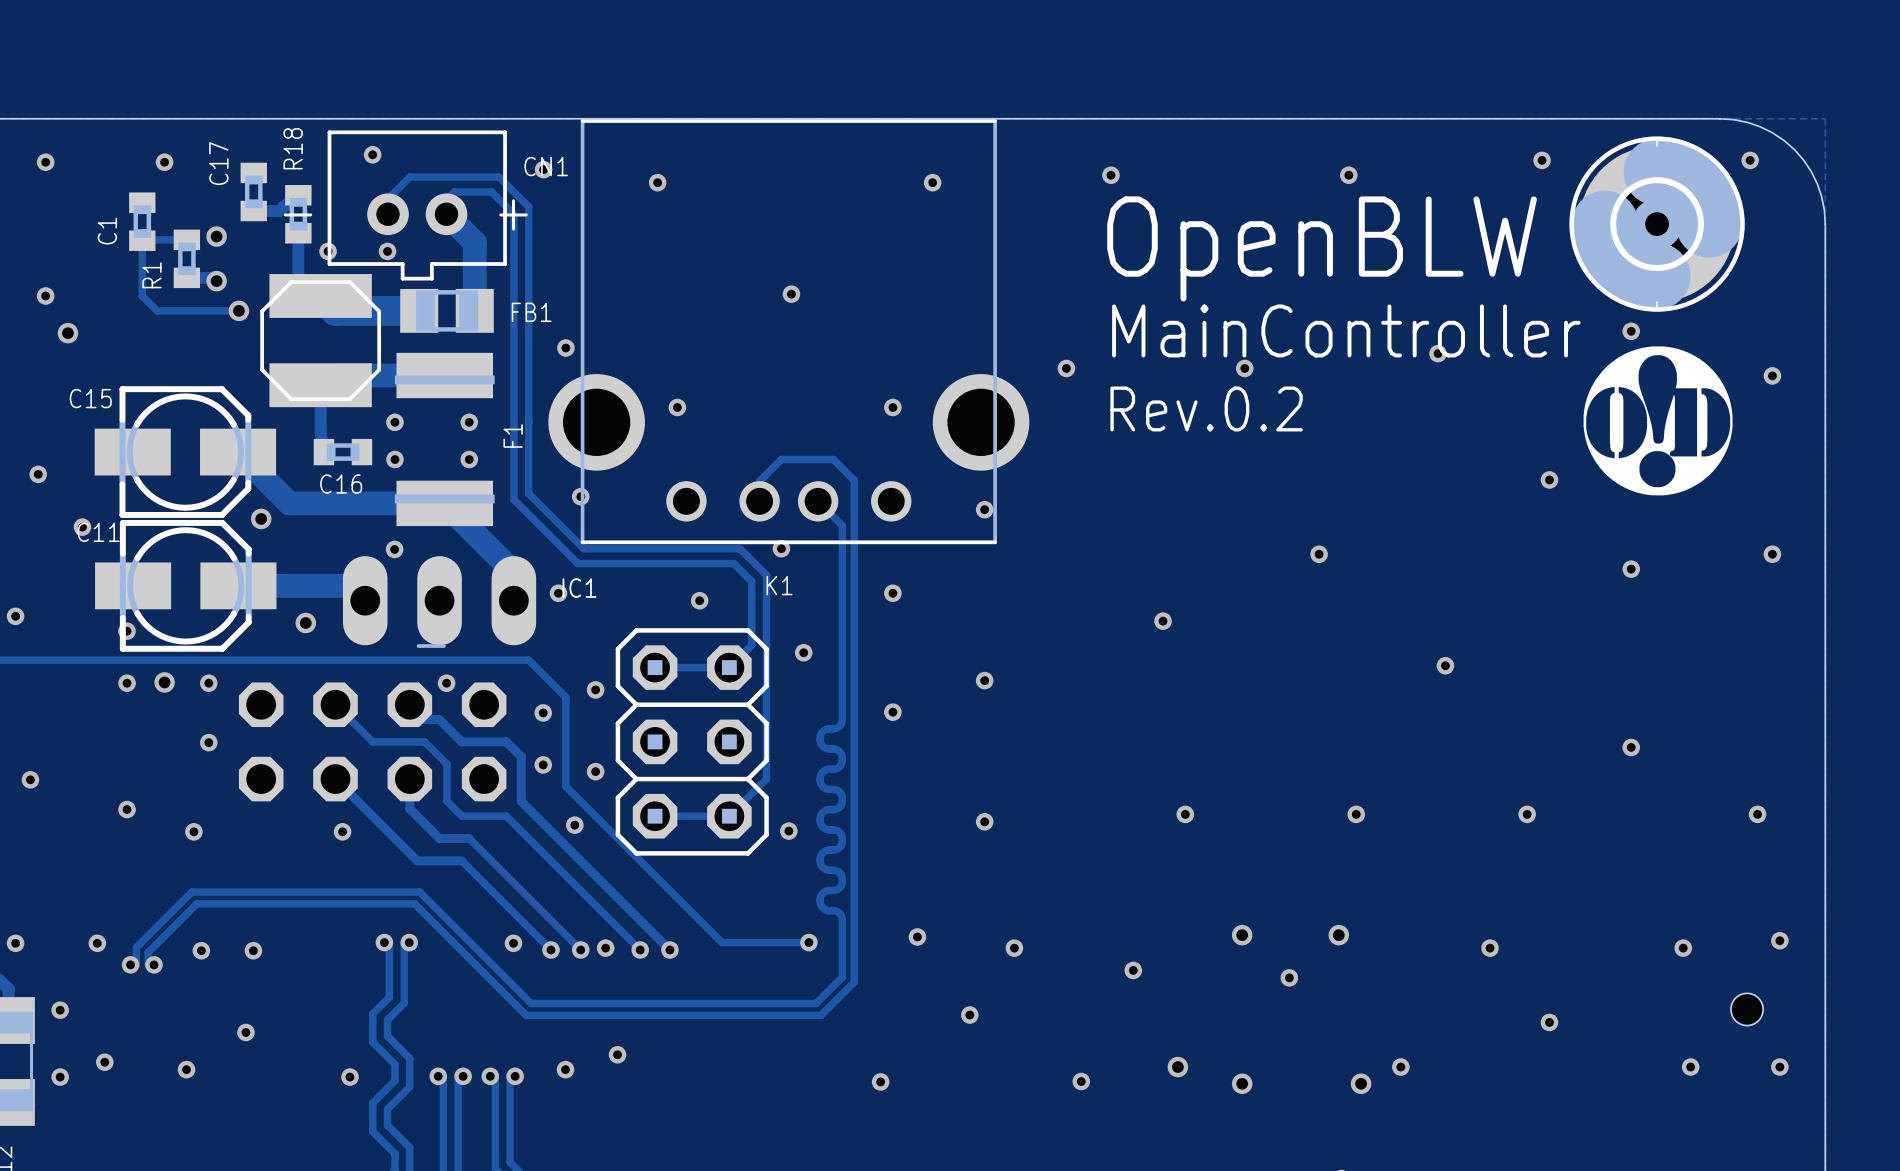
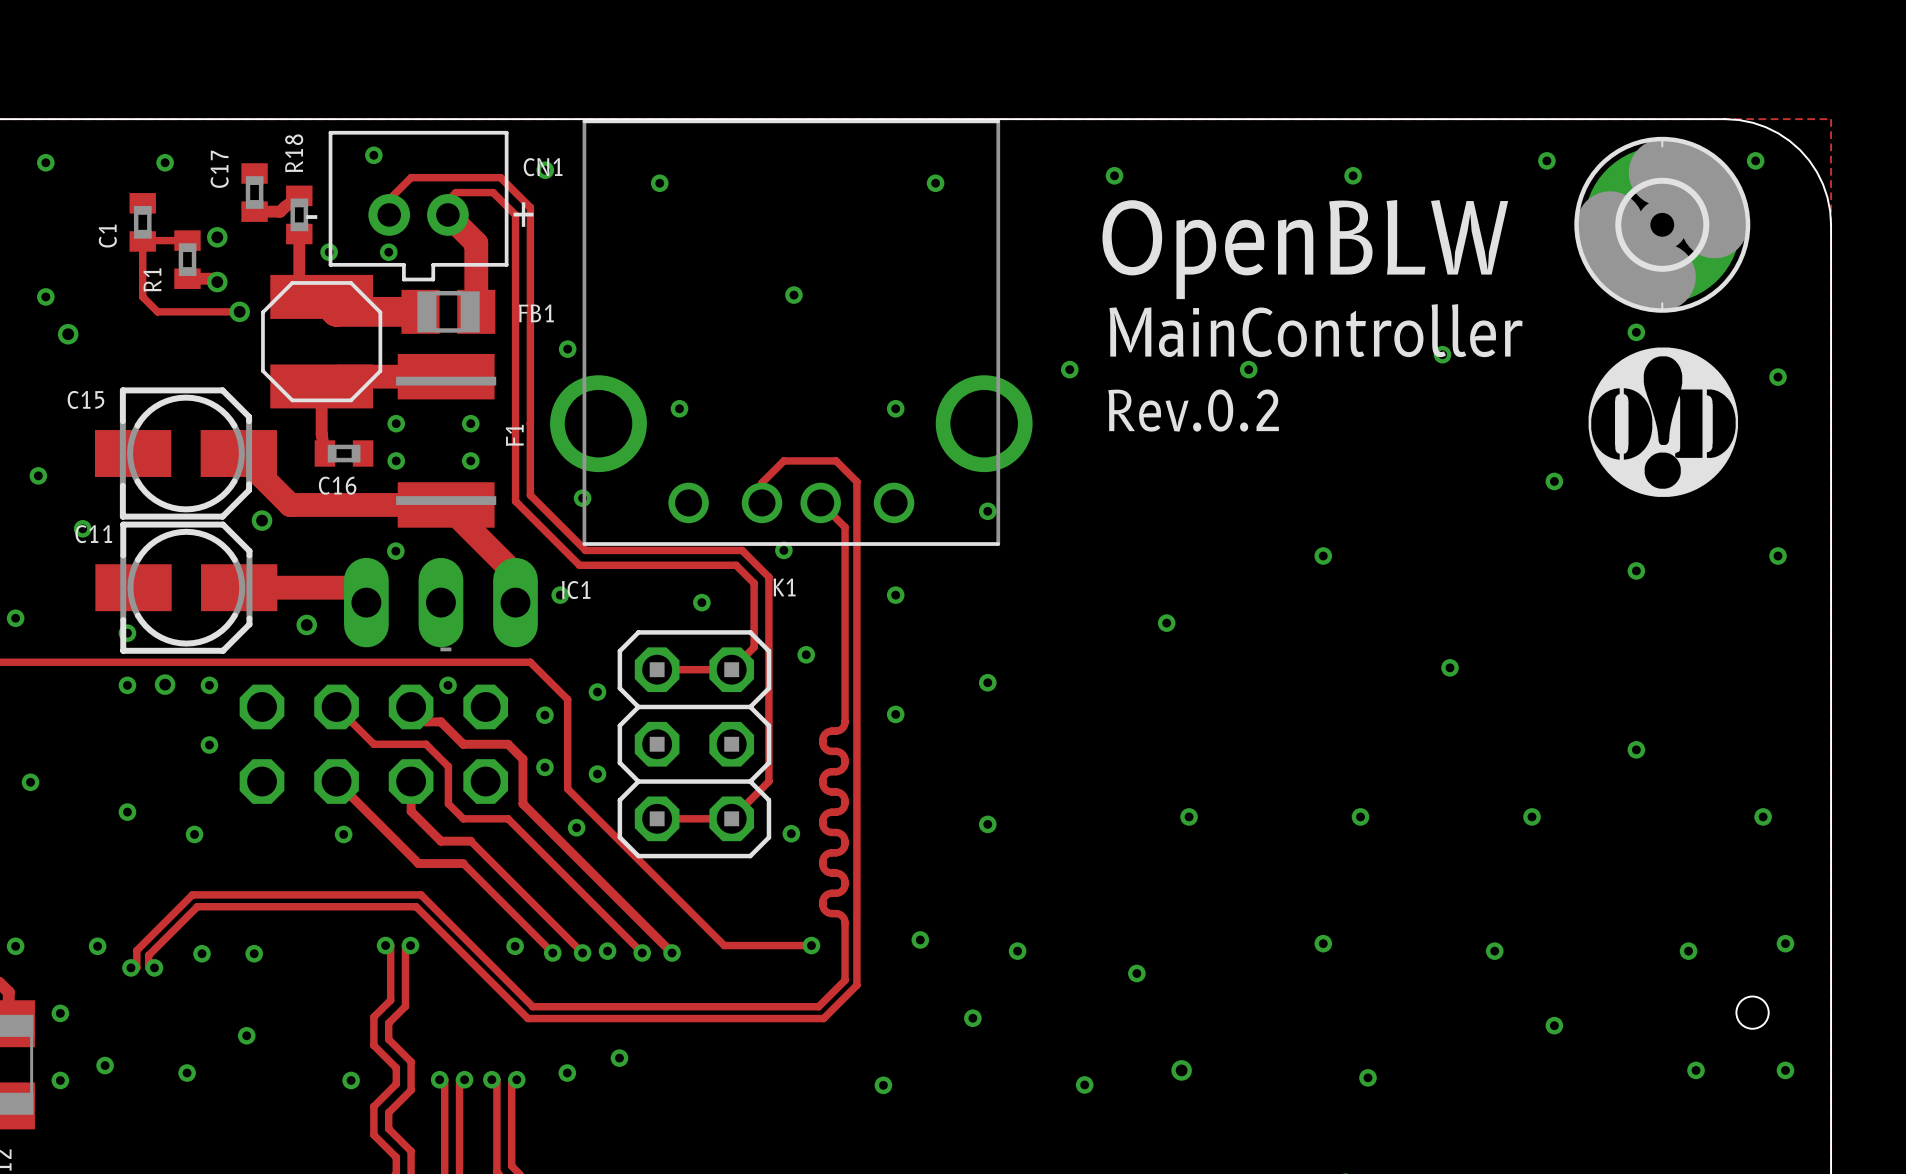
via: (1242, 935) -> none
via: (1338, 935) -> none
via position: (1289, 977) -> (1323, 943)
via position: (1400, 1067) -> (1367, 1077)
via: (1242, 1083) -> none
via: (1361, 1083) -> none

